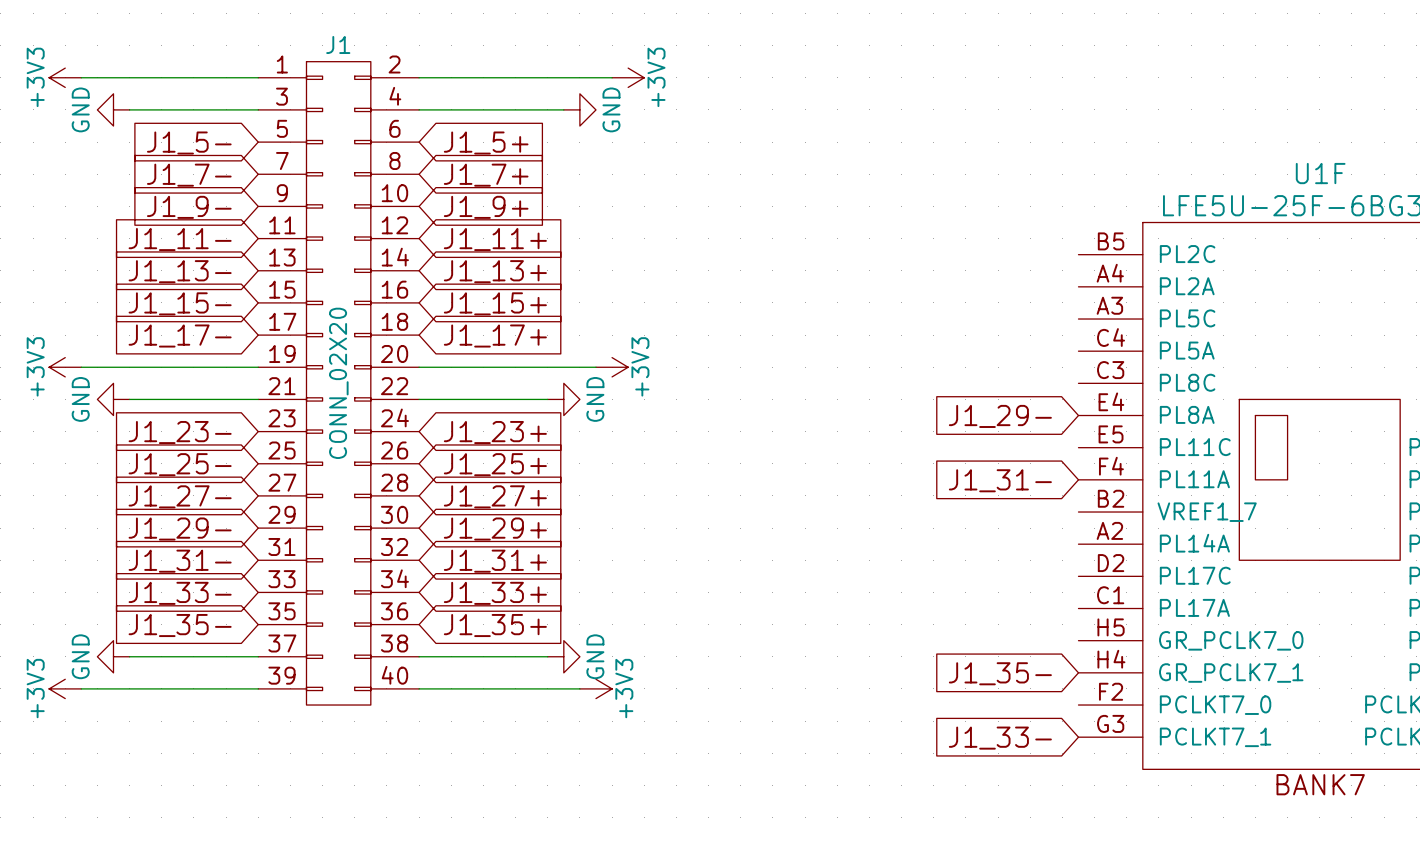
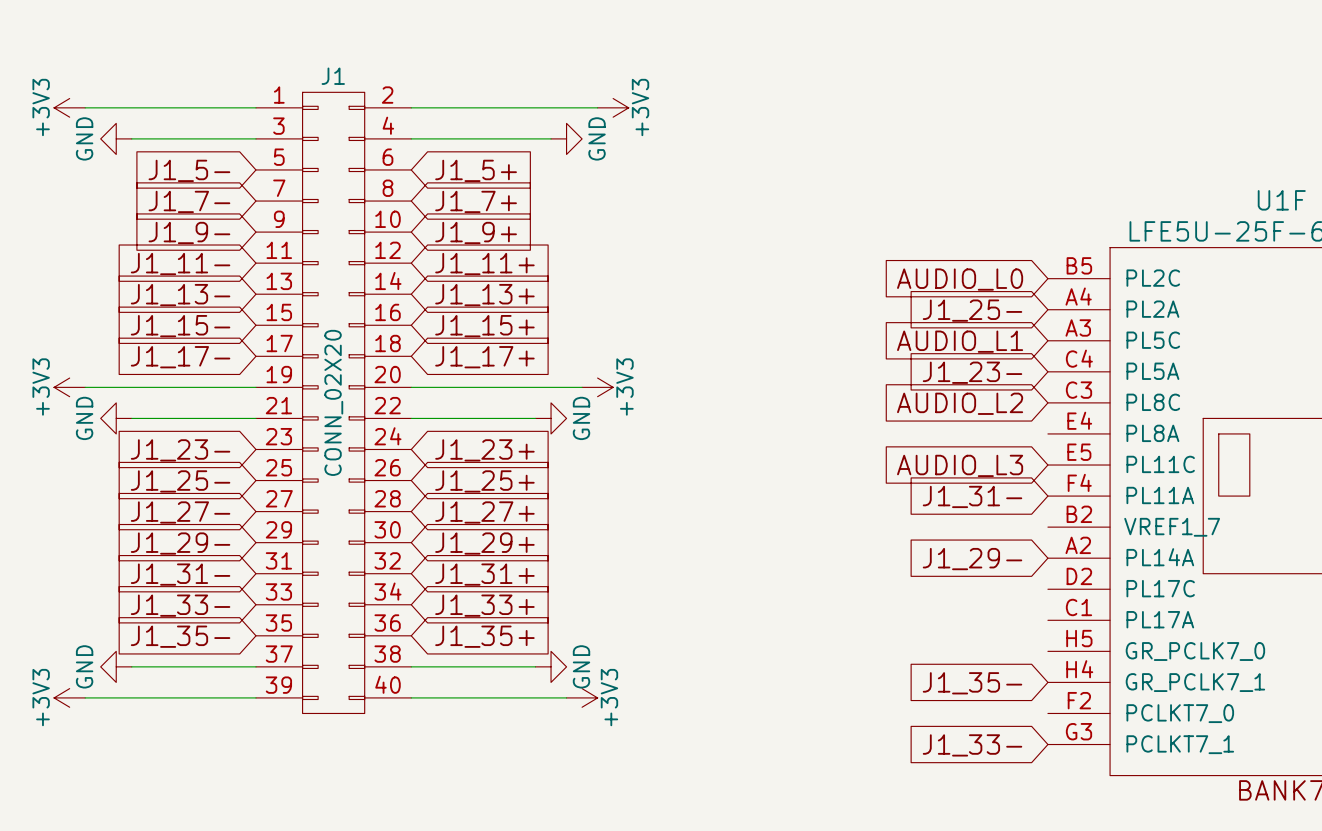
global label: none -> AUDIO_L0 (960, 279)
global label: none -> J1_25- (972, 310)
global label: none -> AUDIO_L1 (960, 341)
global label: none -> J1_23- (972, 372)
global label: none -> AUDIO_L2 (960, 403)
global label position: J1_29- (1000, 416) -> J1_29- (972, 559)
global label: none -> AUDIO_L3 (960, 465)

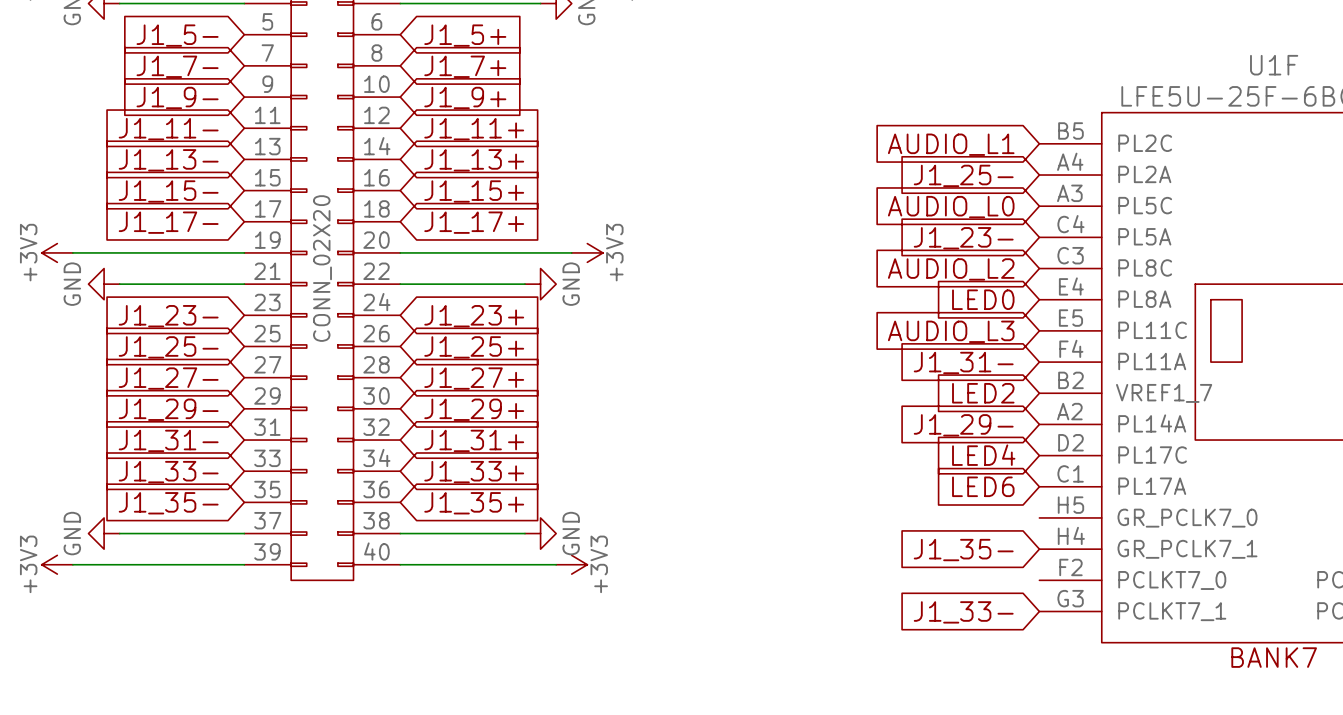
global label: AUDIO_L0 (960, 279) -> AUDIO_L1 (951, 144)
global label: AUDIO_L1 (960, 341) -> AUDIO_L0 (951, 207)
global label: none -> LED0 (983, 299)
global label: none -> LED2 (983, 393)
global label: none -> LED4 (983, 455)
global label: none -> LED6 (983, 486)

